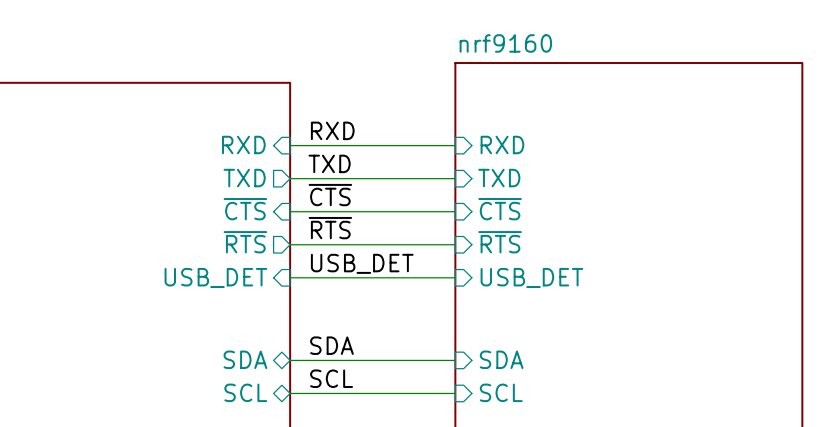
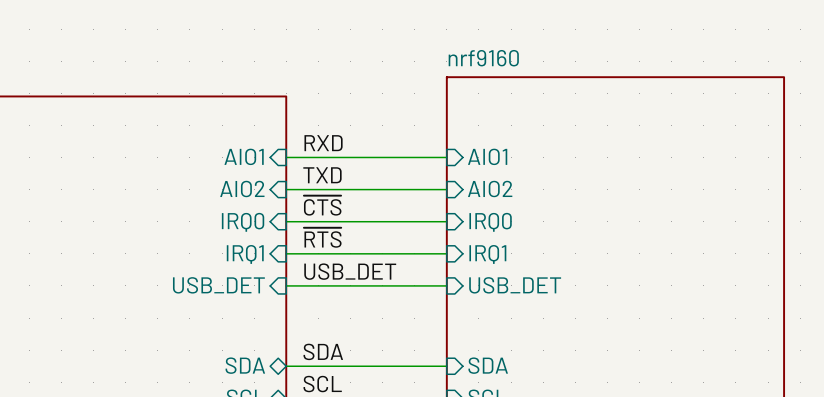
sheet pin: RXD (243, 145) -> AIO1 (244, 156)
sheet pin: RXD (502, 145) -> AIO1 (487, 156)
sheet pin shape: output (244, 178) -> input (242, 188)
sheet pin: TXD (244, 178) -> AIO2 (242, 188)
sheet pin: TXD (499, 178) -> AIO2 (490, 188)
sheet pin: ~{CTS} (245, 209) -> IRQ0 (243, 222)
sheet pin: ~{CTS} (500, 209) -> IRQ0 (490, 222)
sheet pin shape: output (245, 242) -> input (245, 254)
sheet pin: ~{RTS} (245, 242) -> IRQ1 (245, 254)
sheet pin: ~{RTS} (500, 242) -> IRQ1 (487, 254)

